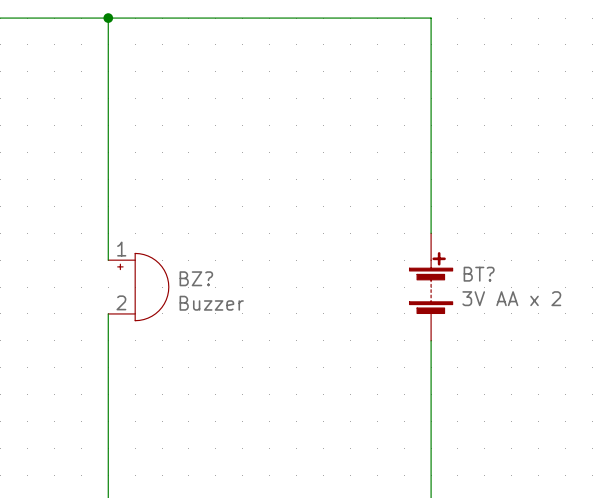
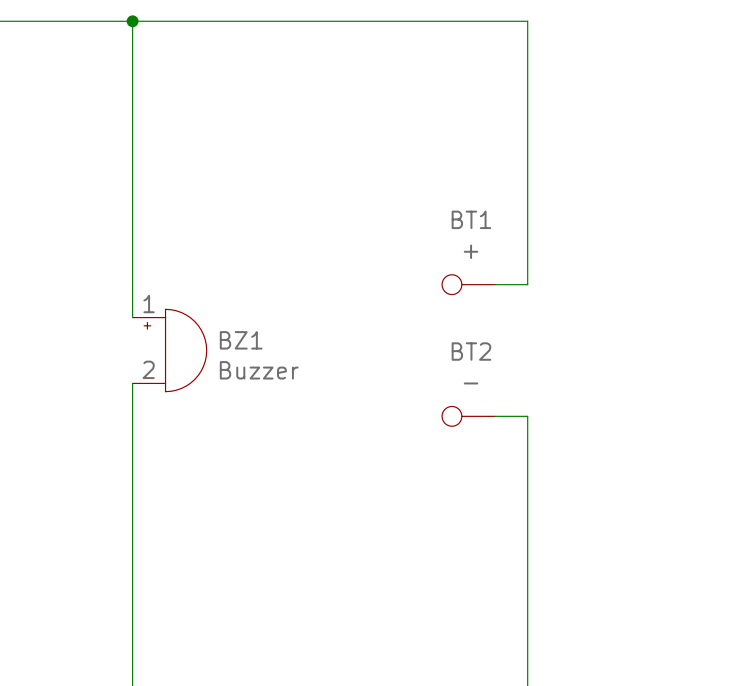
BT1: none -> + (468, 284)
wire: none -> (494, 284) (527, 284)
BZ? name: BZ? (196, 278) -> BZ1 (241, 340)
BT?: 3V AA x 2 (431, 287) -> none
BT2: none -> - (468, 416)
wire: none -> (494, 416) (527, 416)

